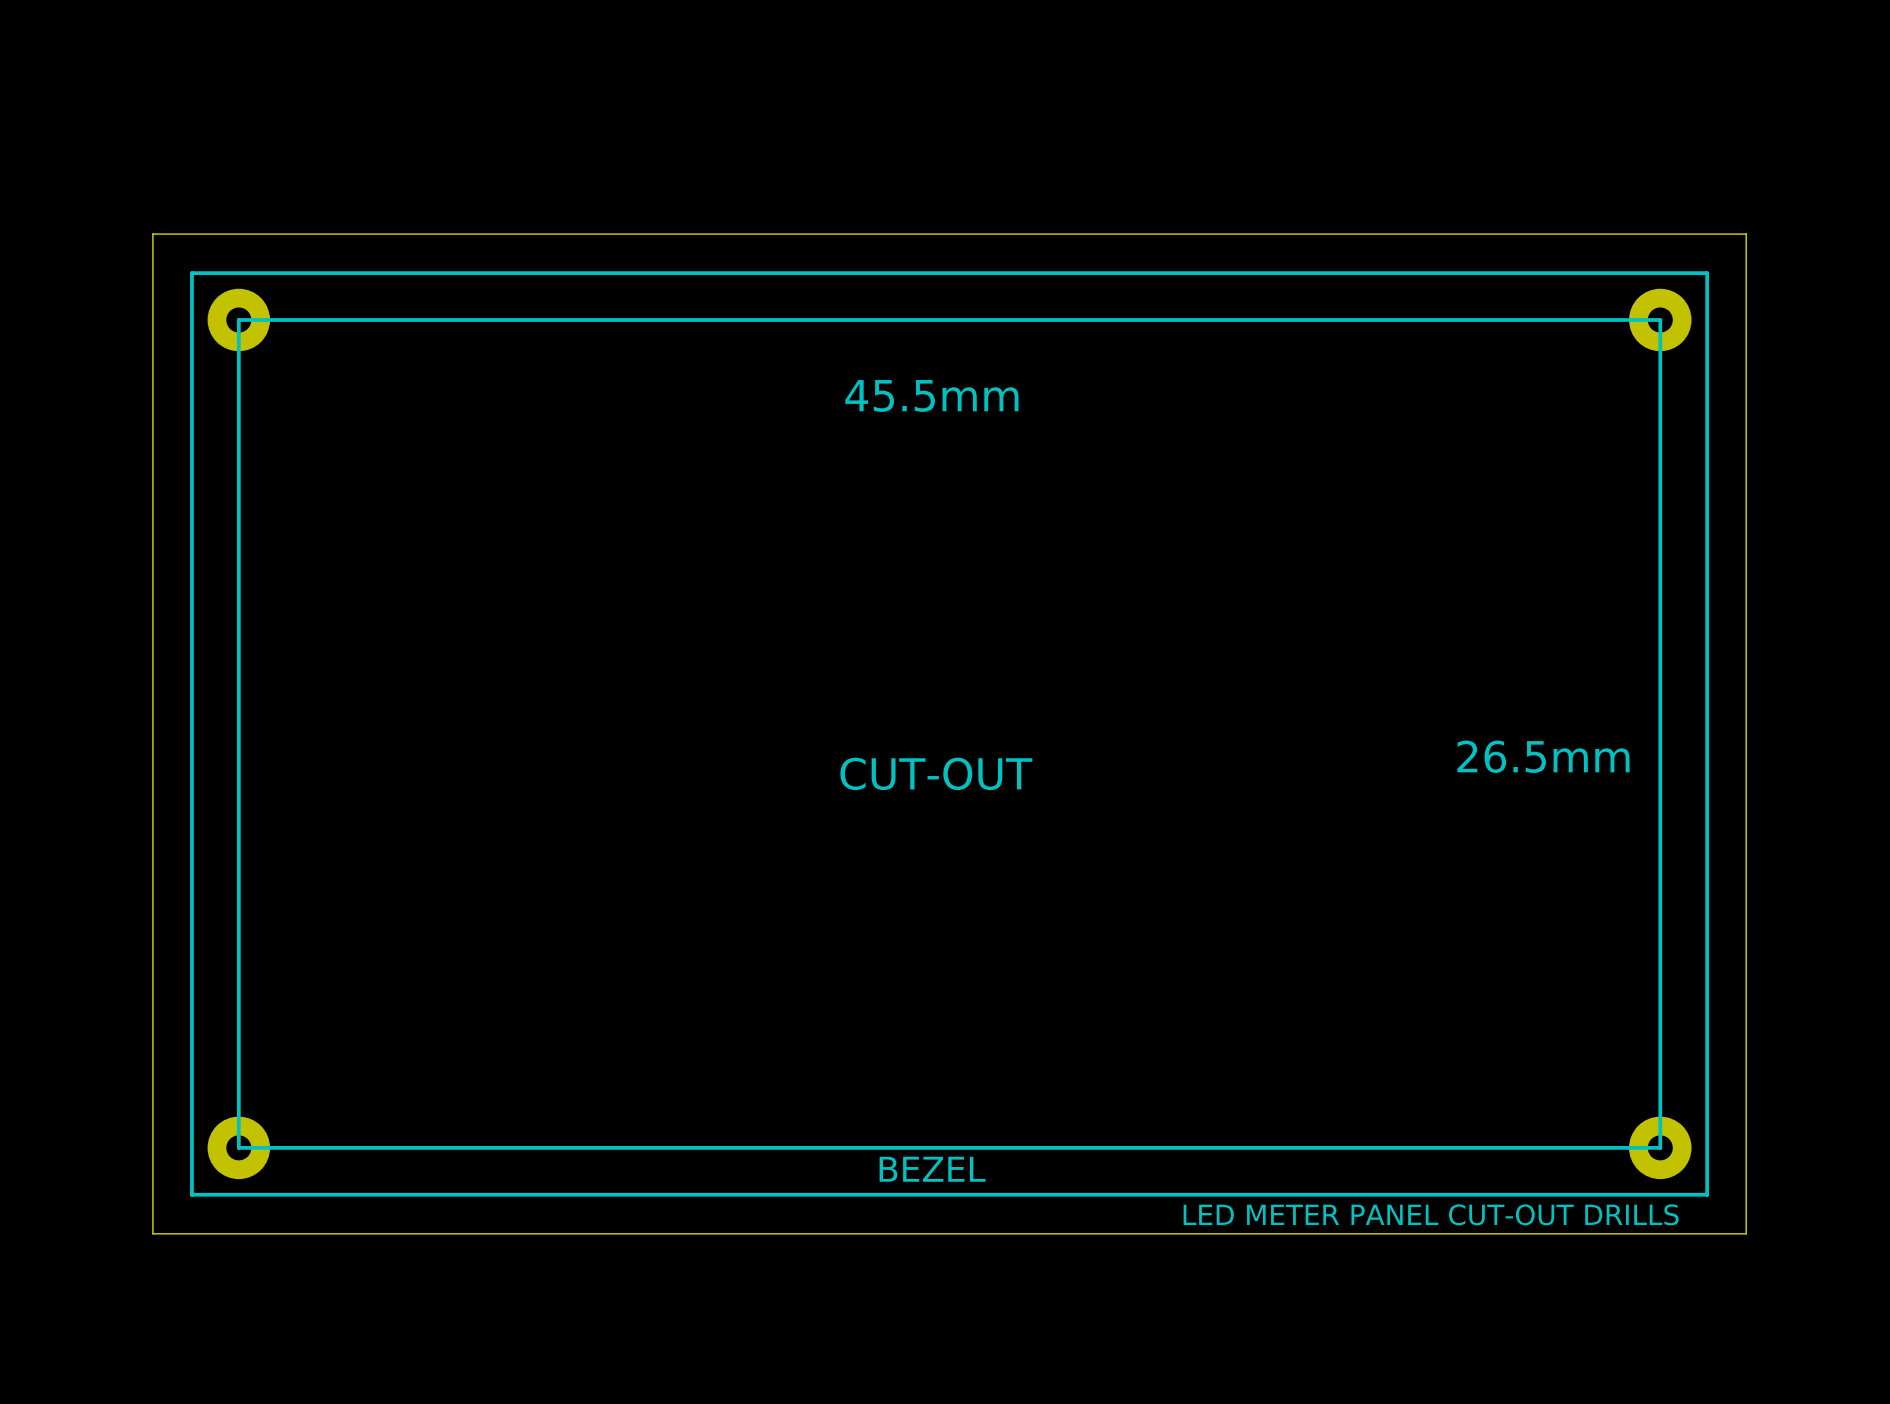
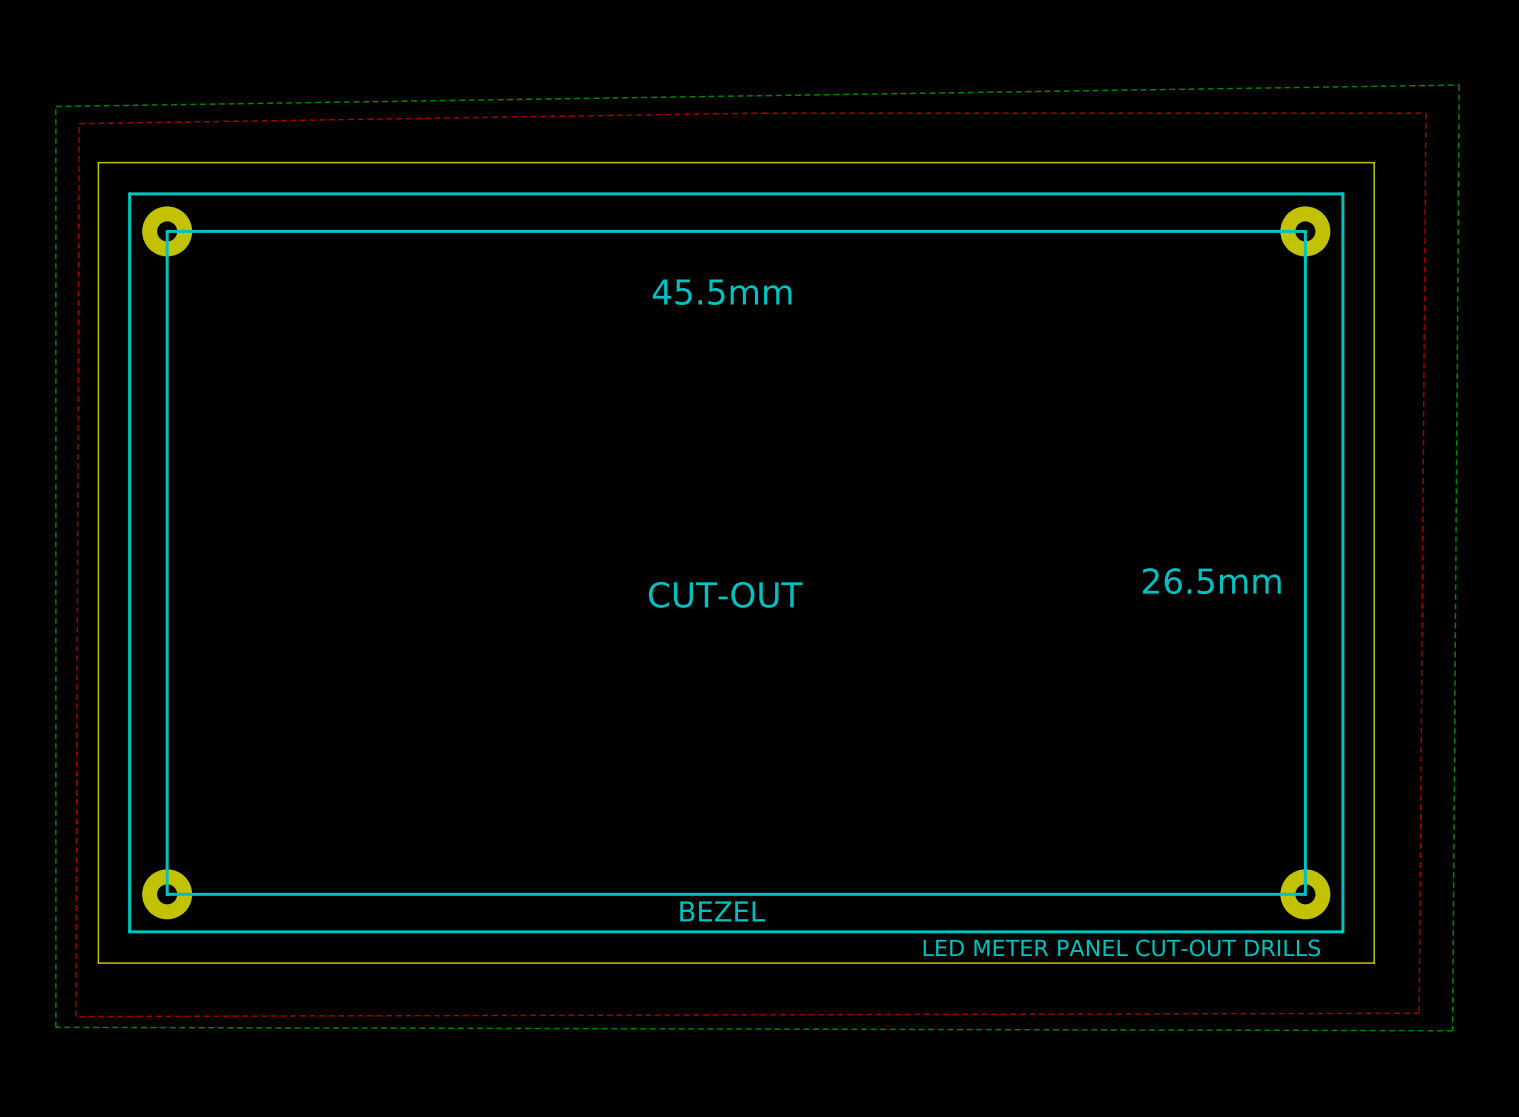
bottom zone outline: none -> (1459, 85) (55, 106) (55, 1027) (1452, 1030) (1459, 85)
top zone outline: none -> (762, 113) (79, 123) (75, 1016) (1419, 1013) (1425, 113) (762, 113)

